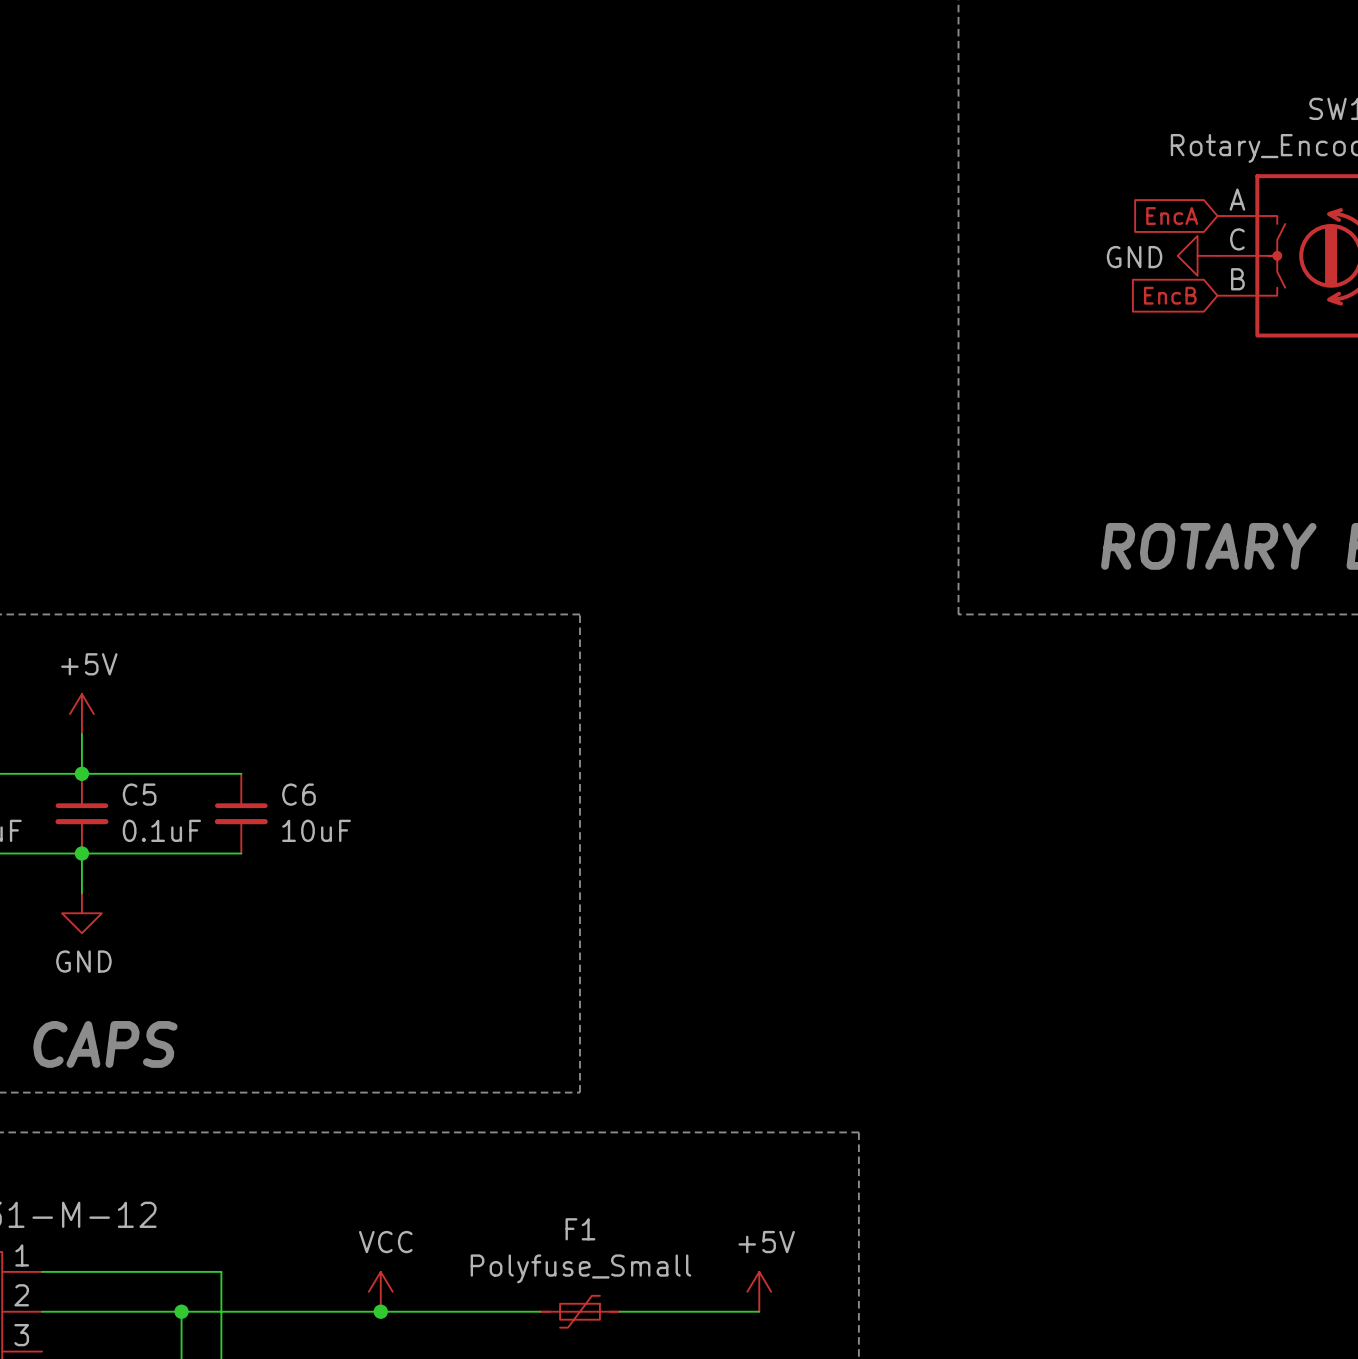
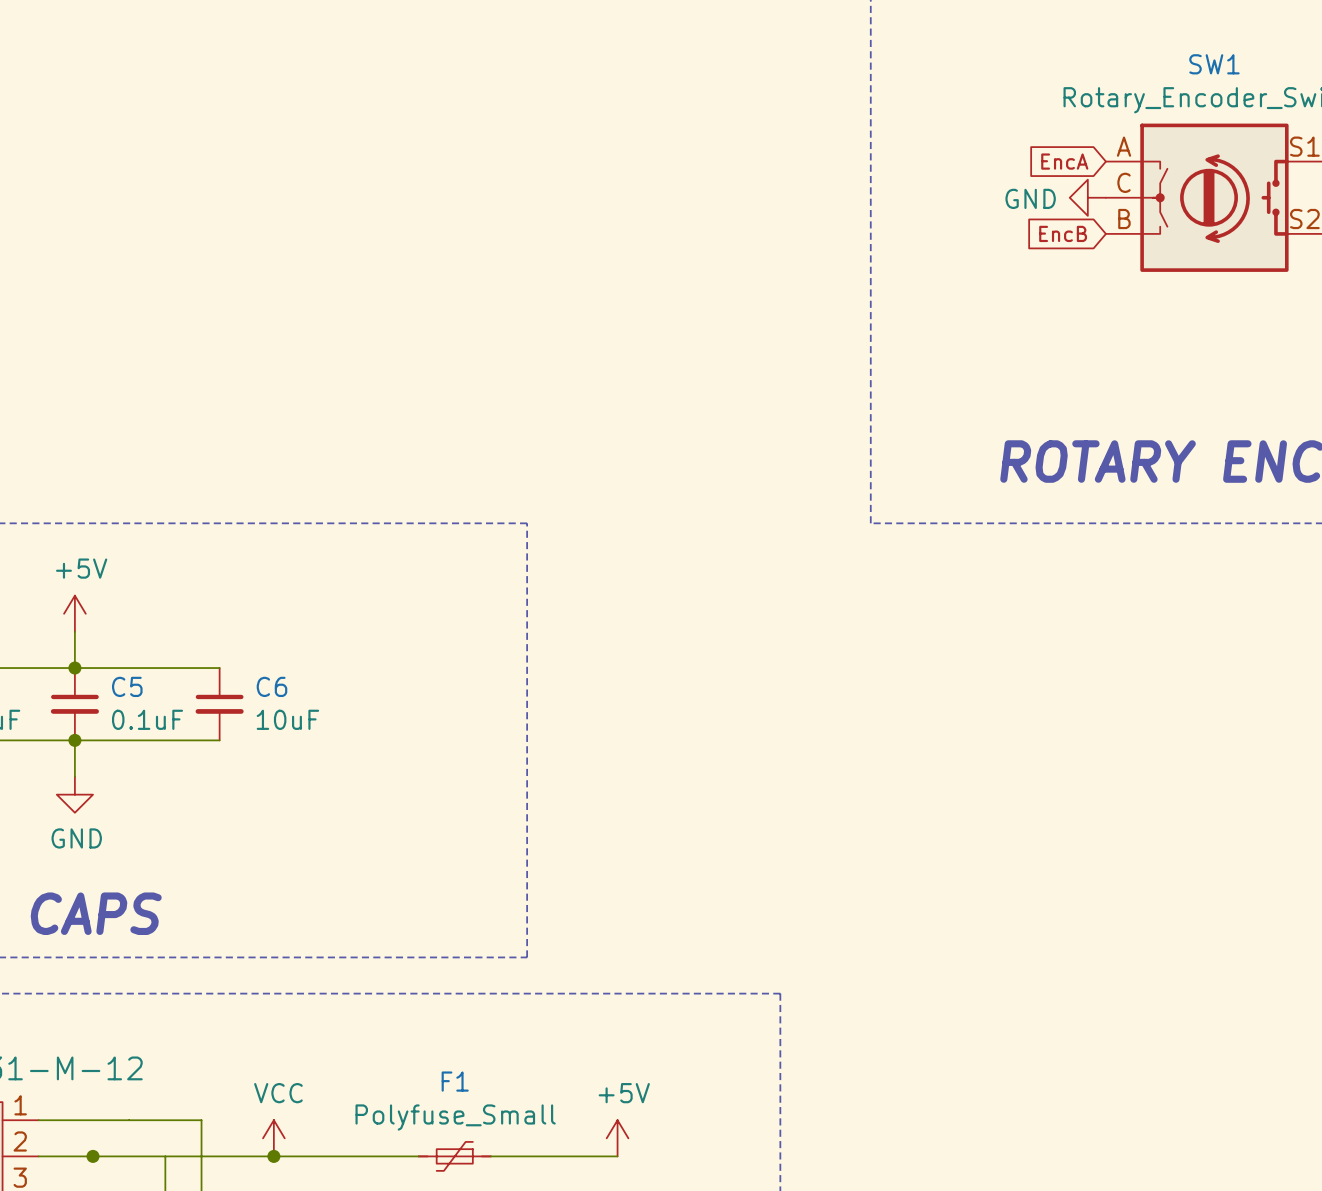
power symbol position: VCC (380, 1291) -> VCC (273, 1138)
power symbol position: +5V (759, 1291) -> +5V (617, 1138)
junction: none -> (93, 1156)
junction: (181, 1311) -> none
junction: none -> (273, 1156)
junction: (380, 1311) -> none
F1 position: (579, 1311) -> (454, 1156)
wire: (679, 1311) (759, 1311) -> none

